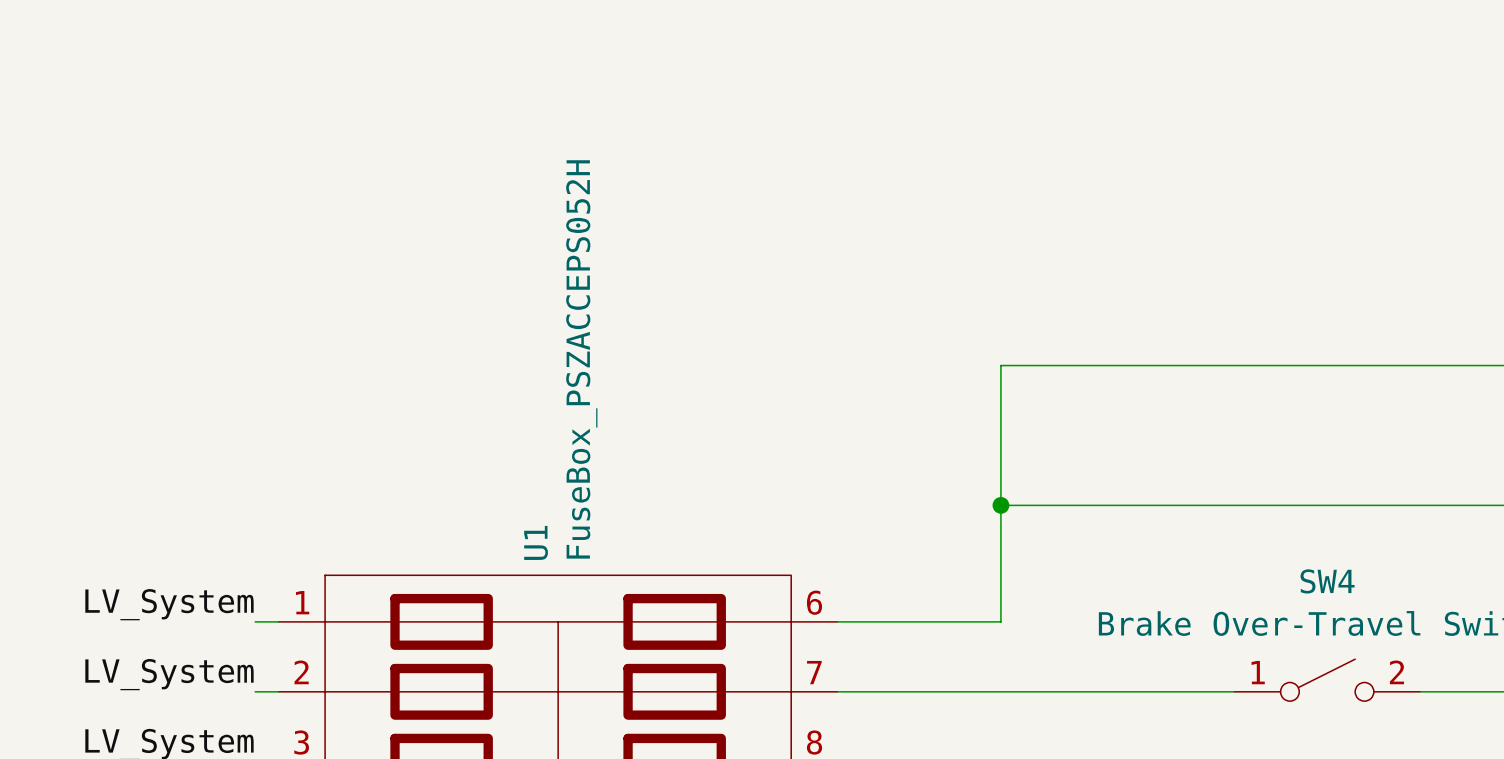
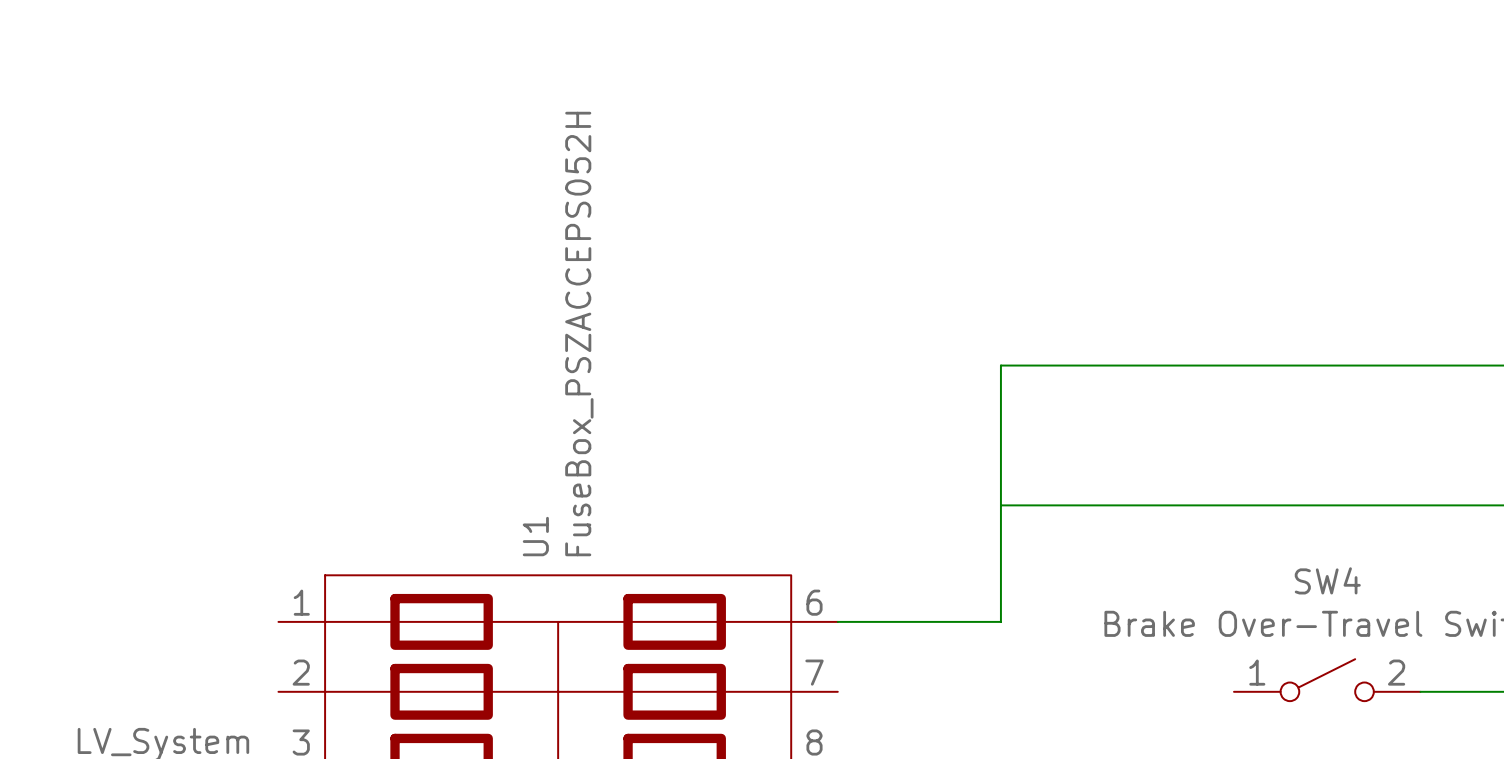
junction: (1000, 505) -> none
label: LV_System (169, 604) -> none
wire: (255, 621) (278, 621) -> none
label: LV_System (169, 674) -> none
wire: (255, 691) (278, 691) -> none
wire: (837, 691) (1234, 691) -> none

